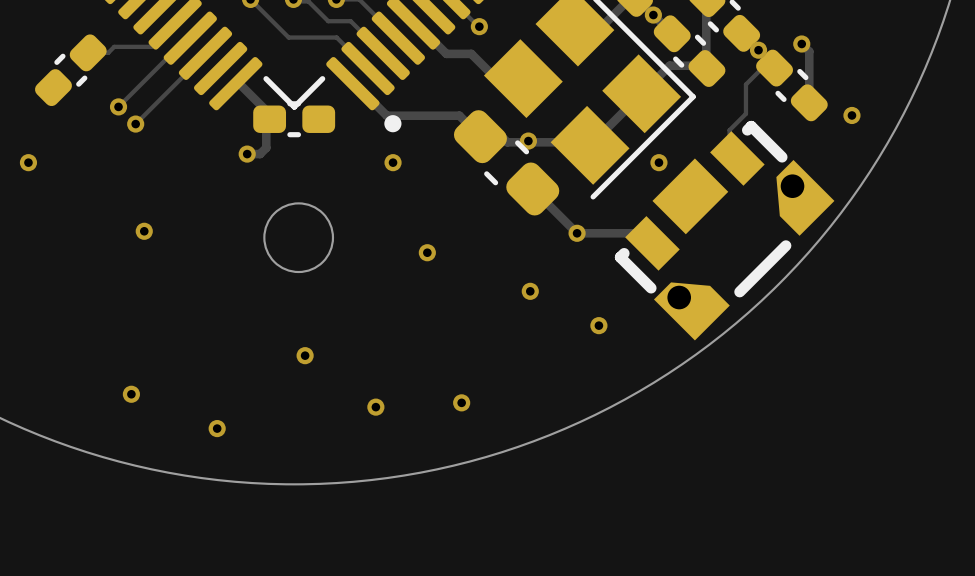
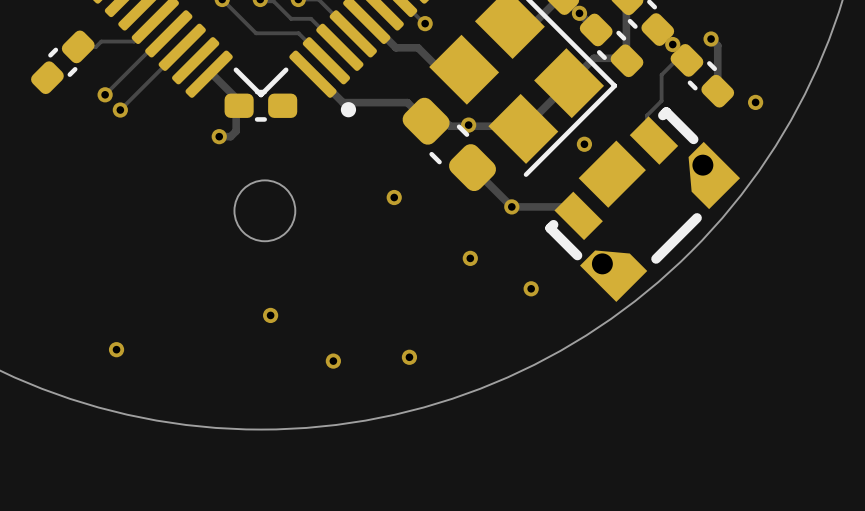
via: (28, 162) -> none
via: (393, 162) -> none
via: (144, 231) -> none
via position: (427, 252) -> (394, 197)
via: (217, 428) -> none

